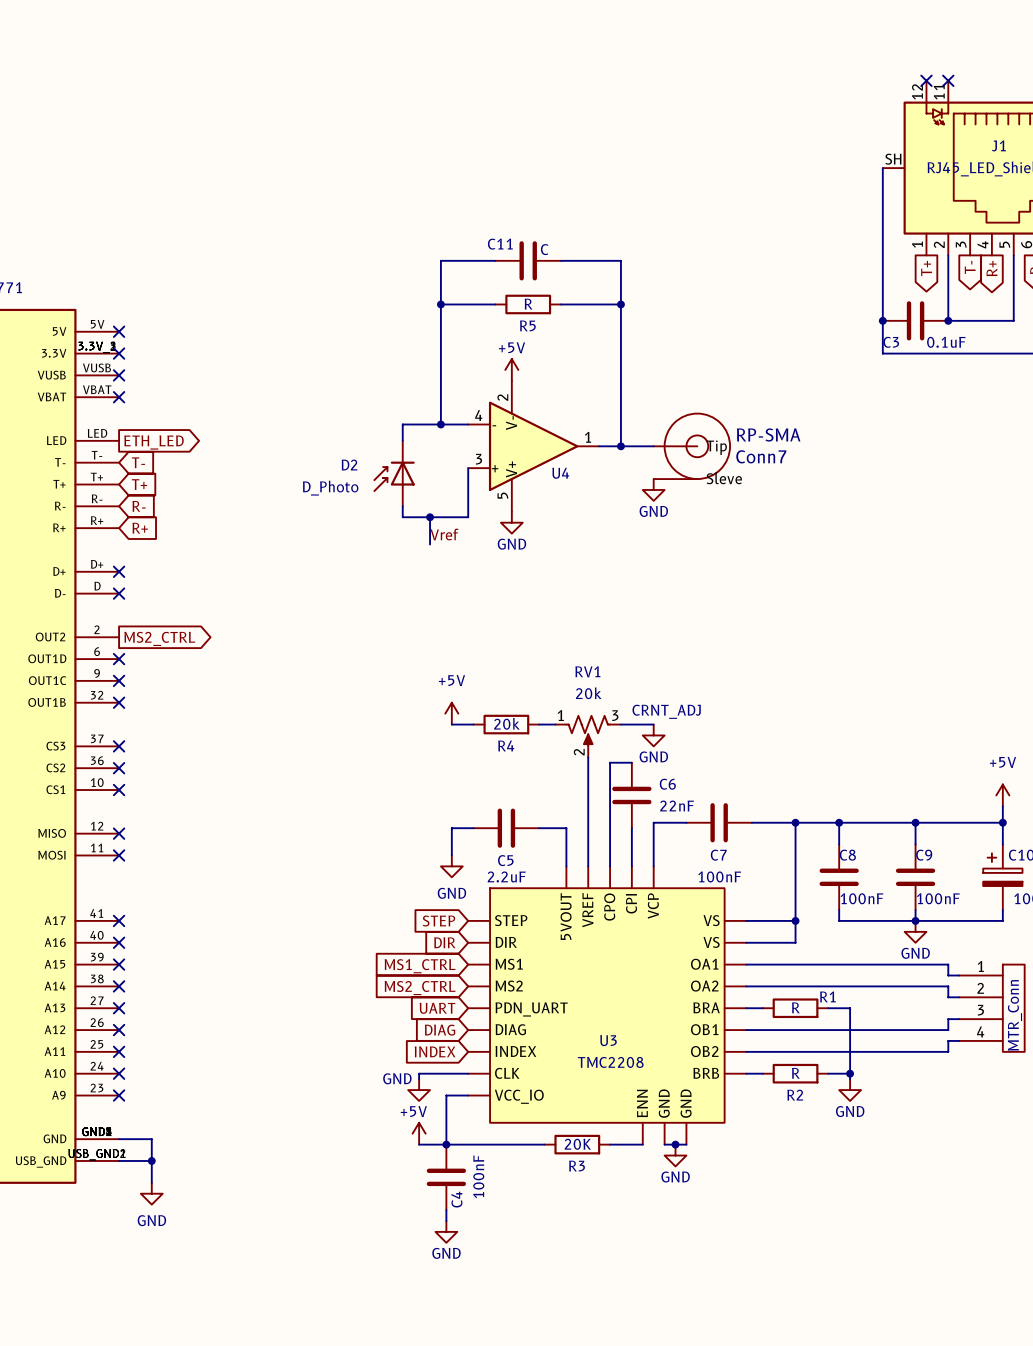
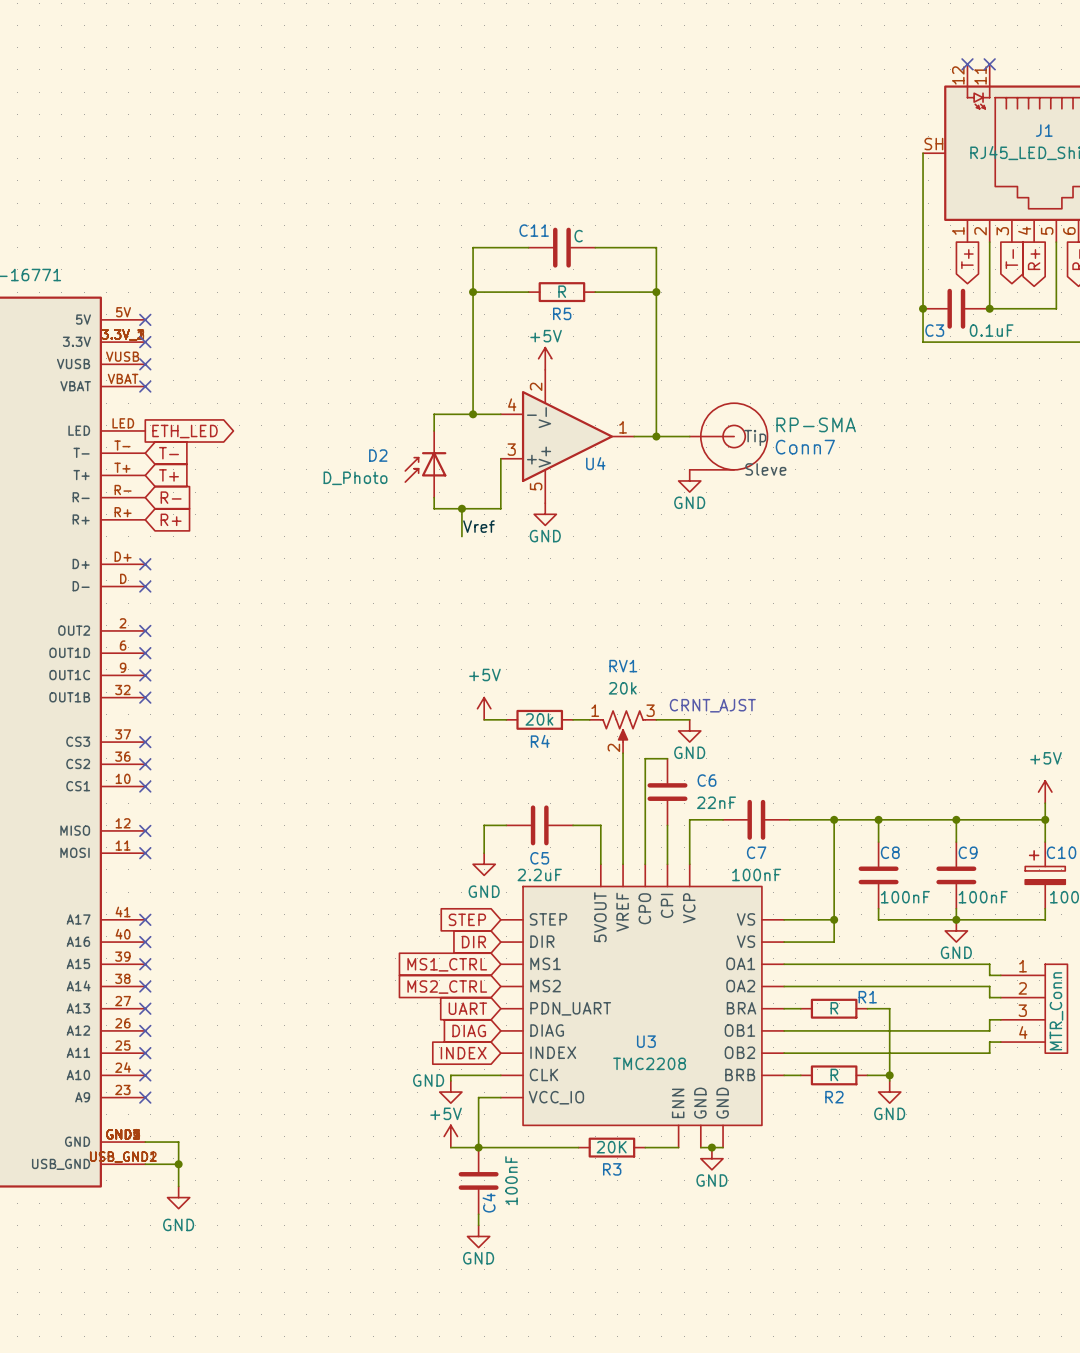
no-connect mark: none -> (145, 630)
global label: MS2_CTRL (159, 638) -> none
text: CRNT_ADJ (666, 711) -> CRNT_AJST (712, 705)

